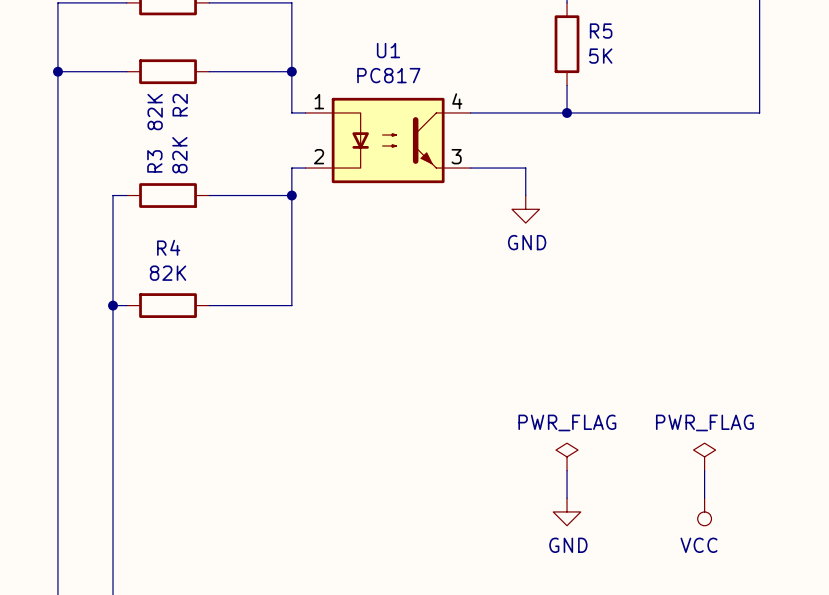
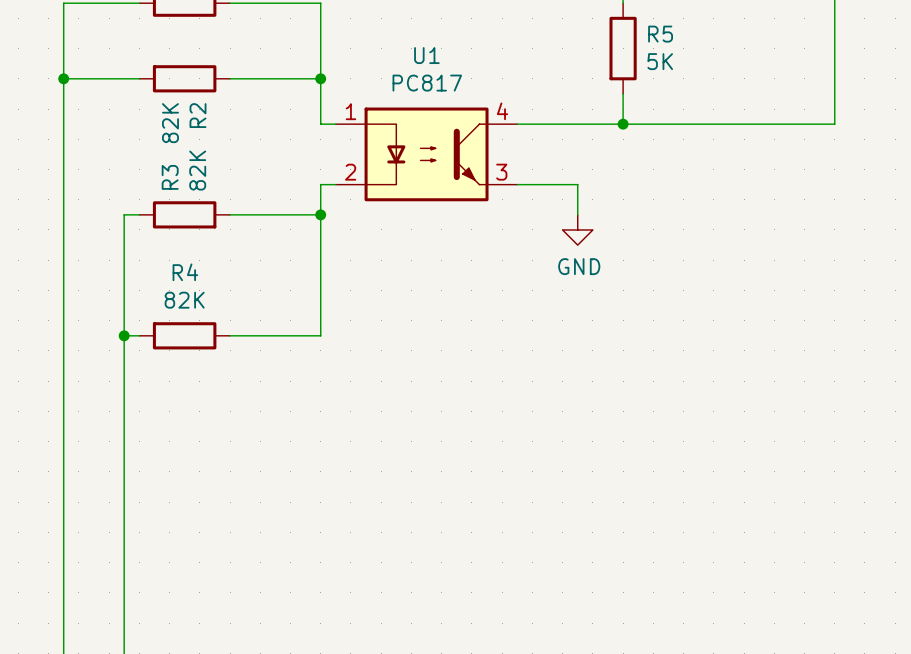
power symbol: PWR_FLAG (567, 456) -> none
power symbol: PWR_FLAG (704, 456) -> none
wire: (567, 470) (567, 498) -> none
wire: (704, 470) (704, 498) -> none
power symbol: GND (567, 511) -> none
power symbol: VCC (704, 511) -> none

